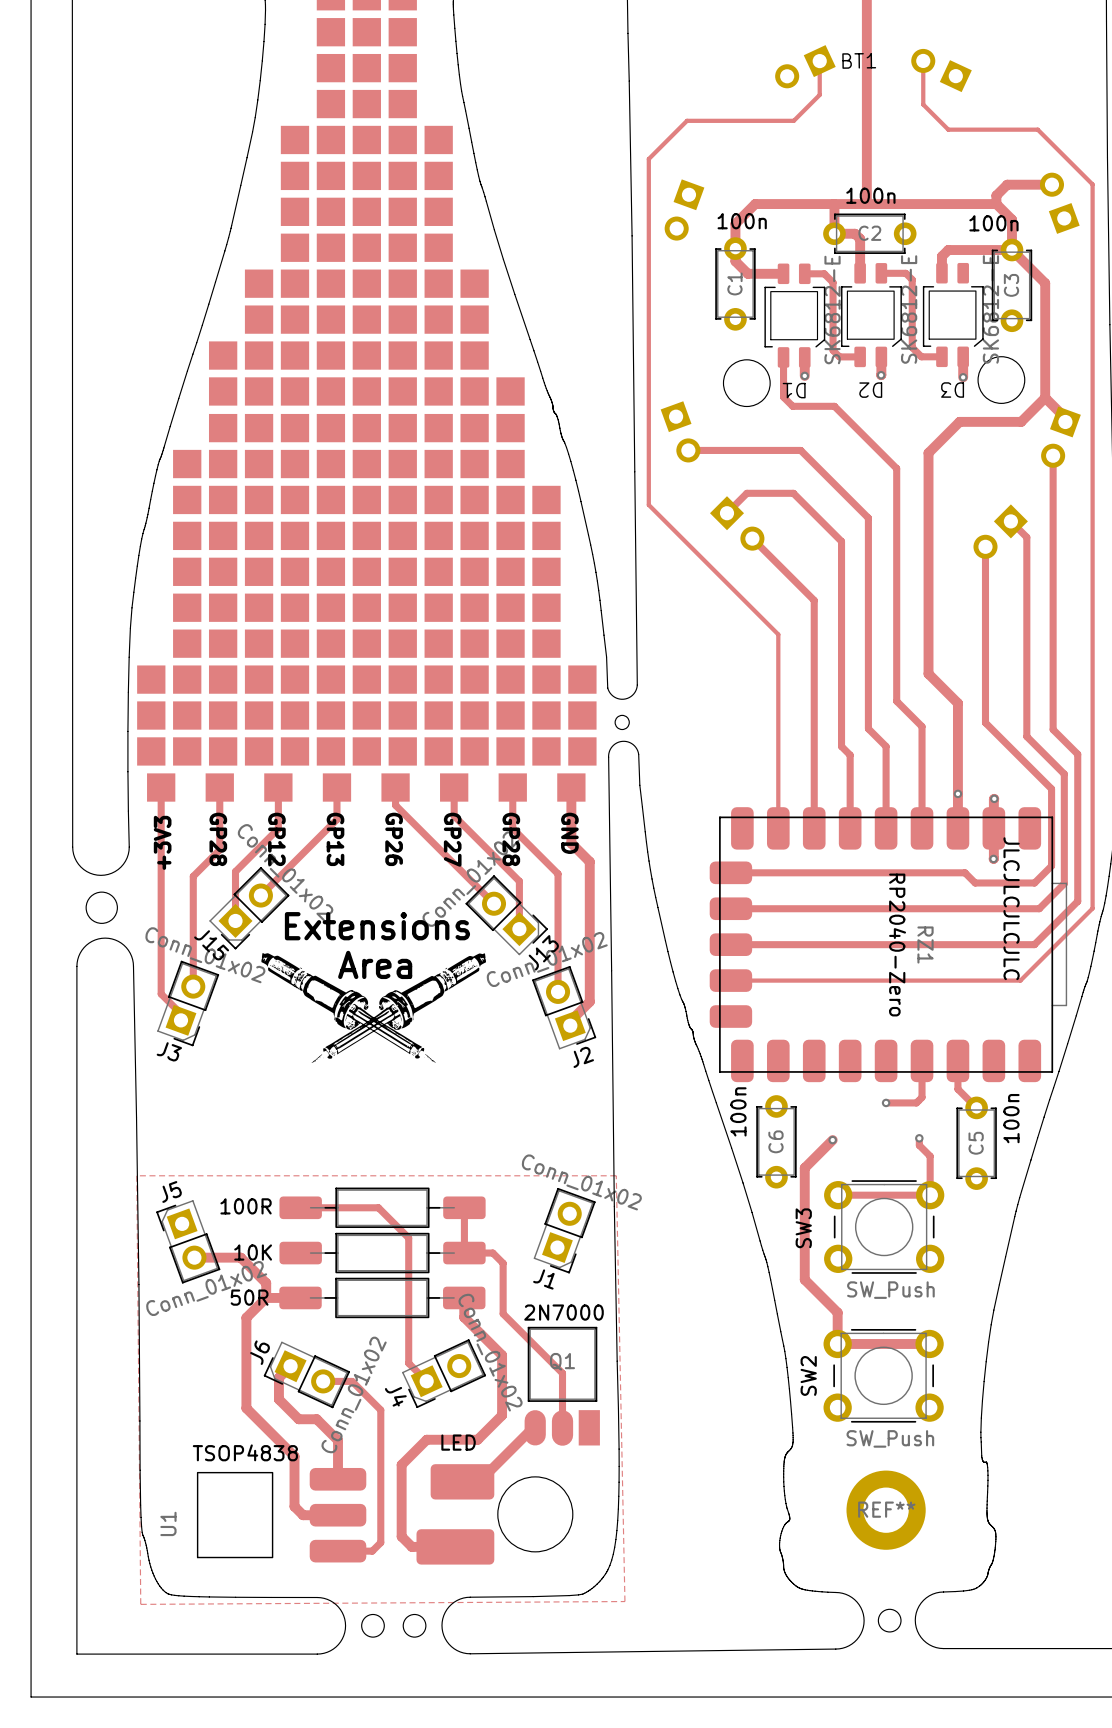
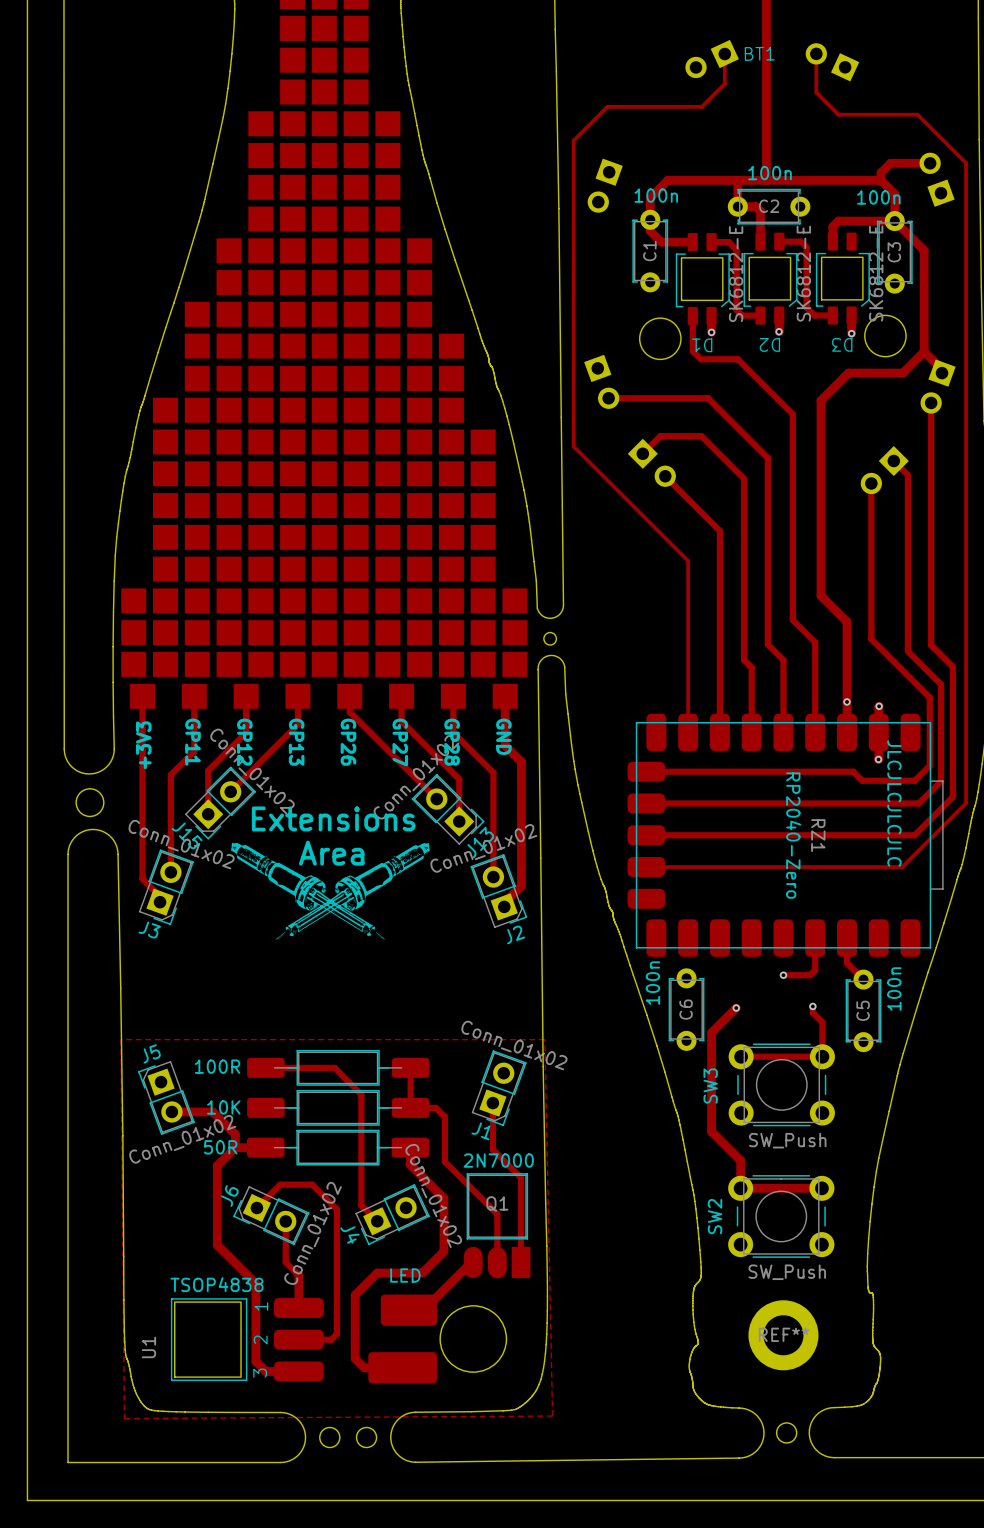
text: GP28 (218, 839) -> GP11 (193, 742)
track: none -> (492, 1103) (492, 1149) (521, 1177) (521, 1262)
track: (246, 1317) (246, 1408) (294, 1456) (294, 1506) (303, 1515) (338, 1515) -> (217, 1165) (217, 1245) (255, 1283) (255, 1361) (265, 1371) (298, 1371)
track: (290, 1366) (278, 1377) (278, 1399) (298, 1419) (316, 1419) (338, 1442) -> (285, 1221) (285, 1262) (298, 1275)
track: none -> (256, 1207) (280, 1184) (312, 1184) (336, 1209) (336, 1333) (331, 1339) (298, 1339)
track: (323, 1381) (352, 1381) (380, 1410) (380, 1542) (372, 1551) (338, 1551) -> none
U1 footprint: [196, 1467, 367, 1563] -> [170, 1297, 324, 1382]

